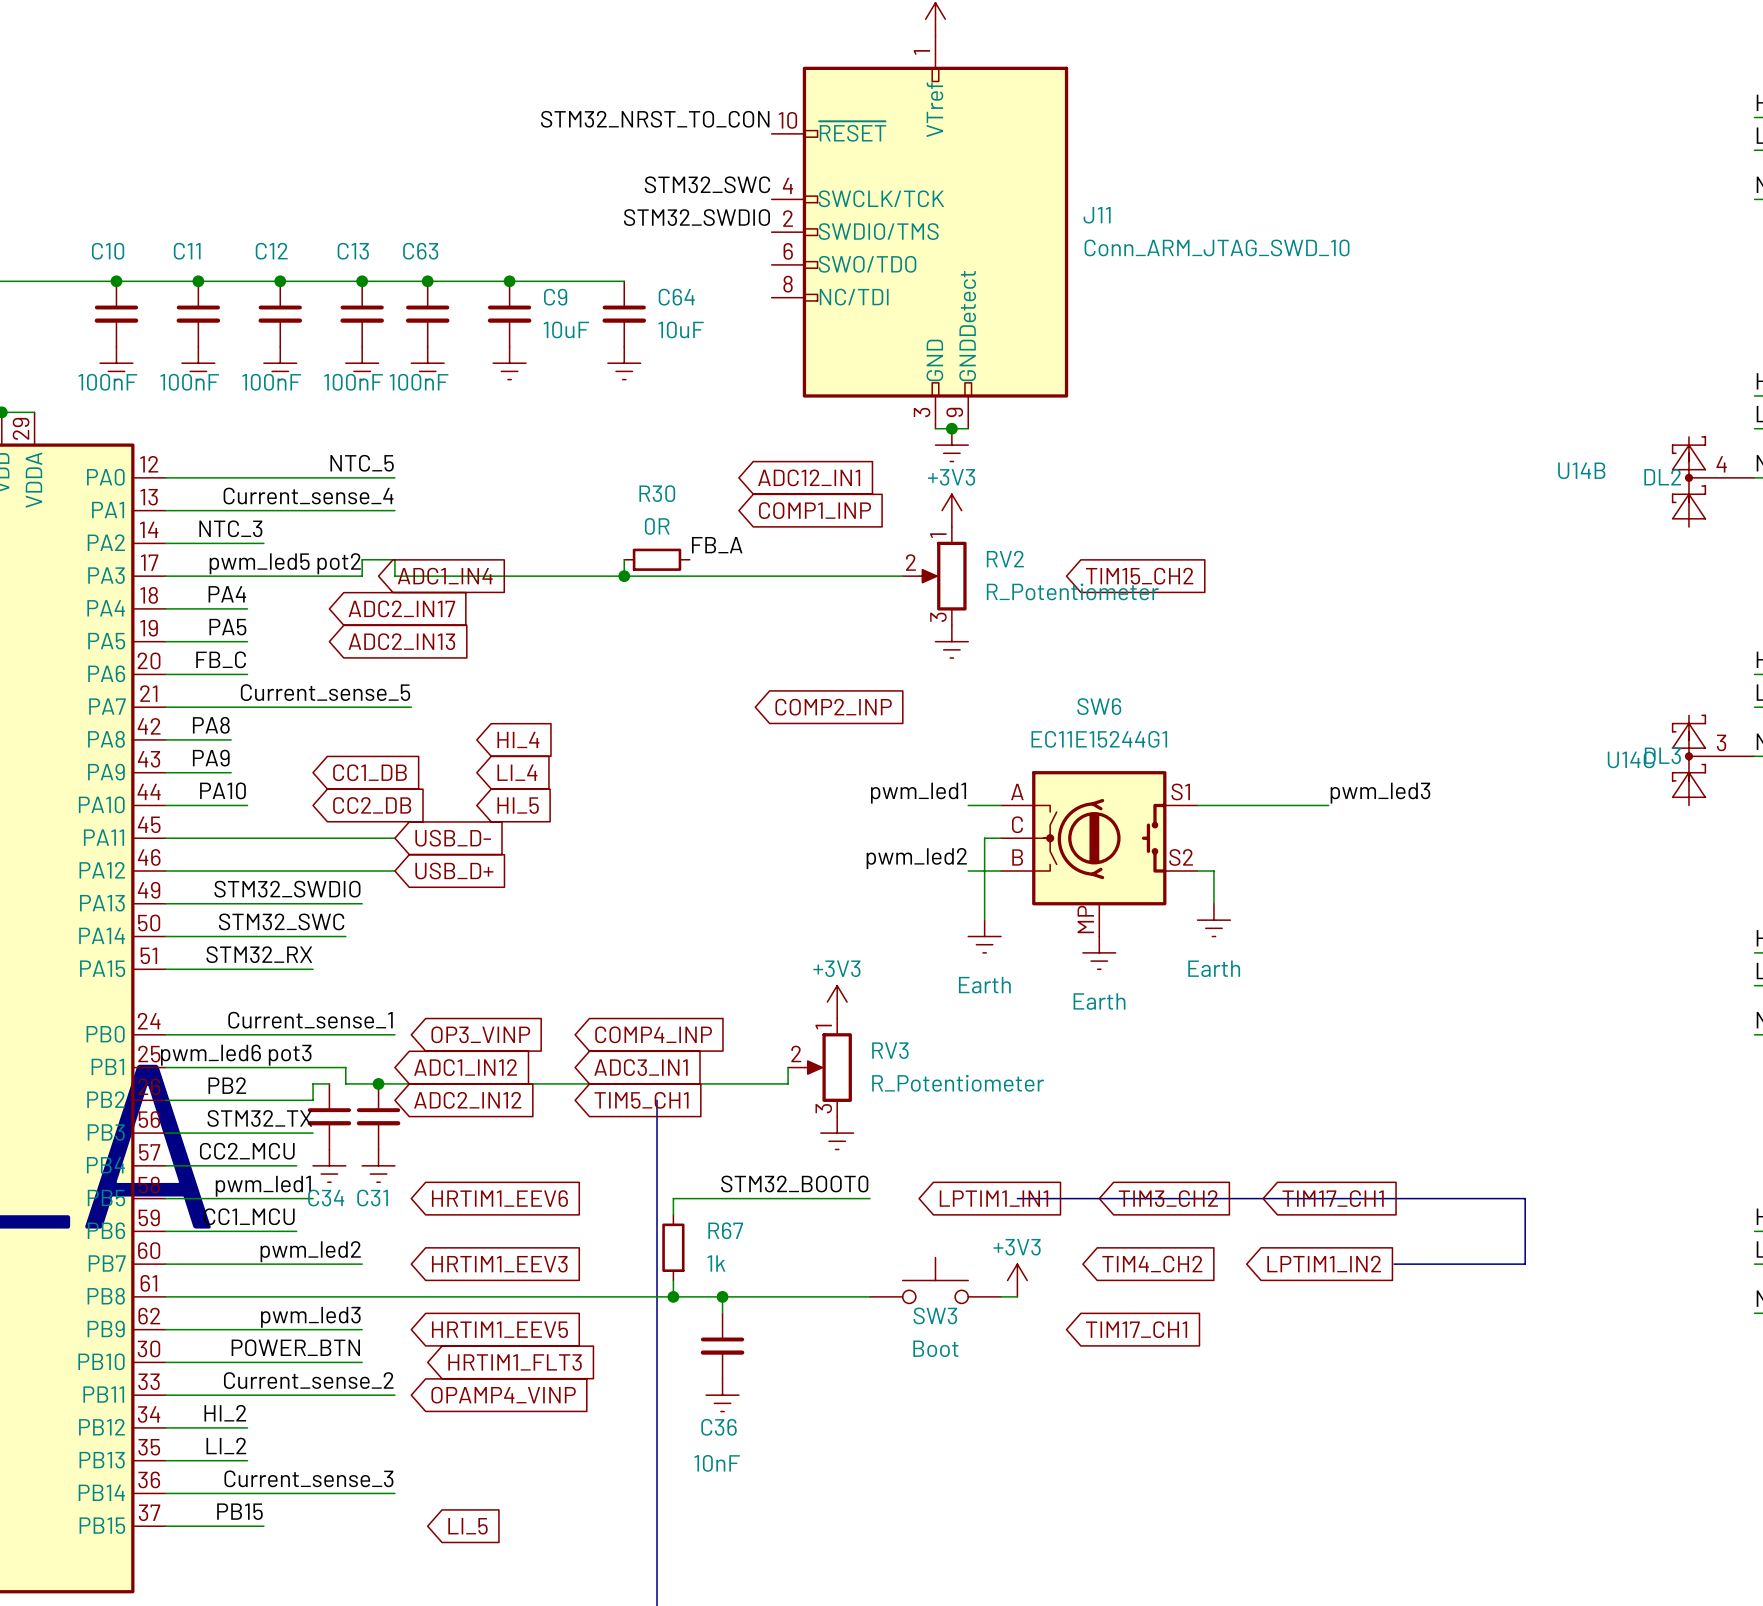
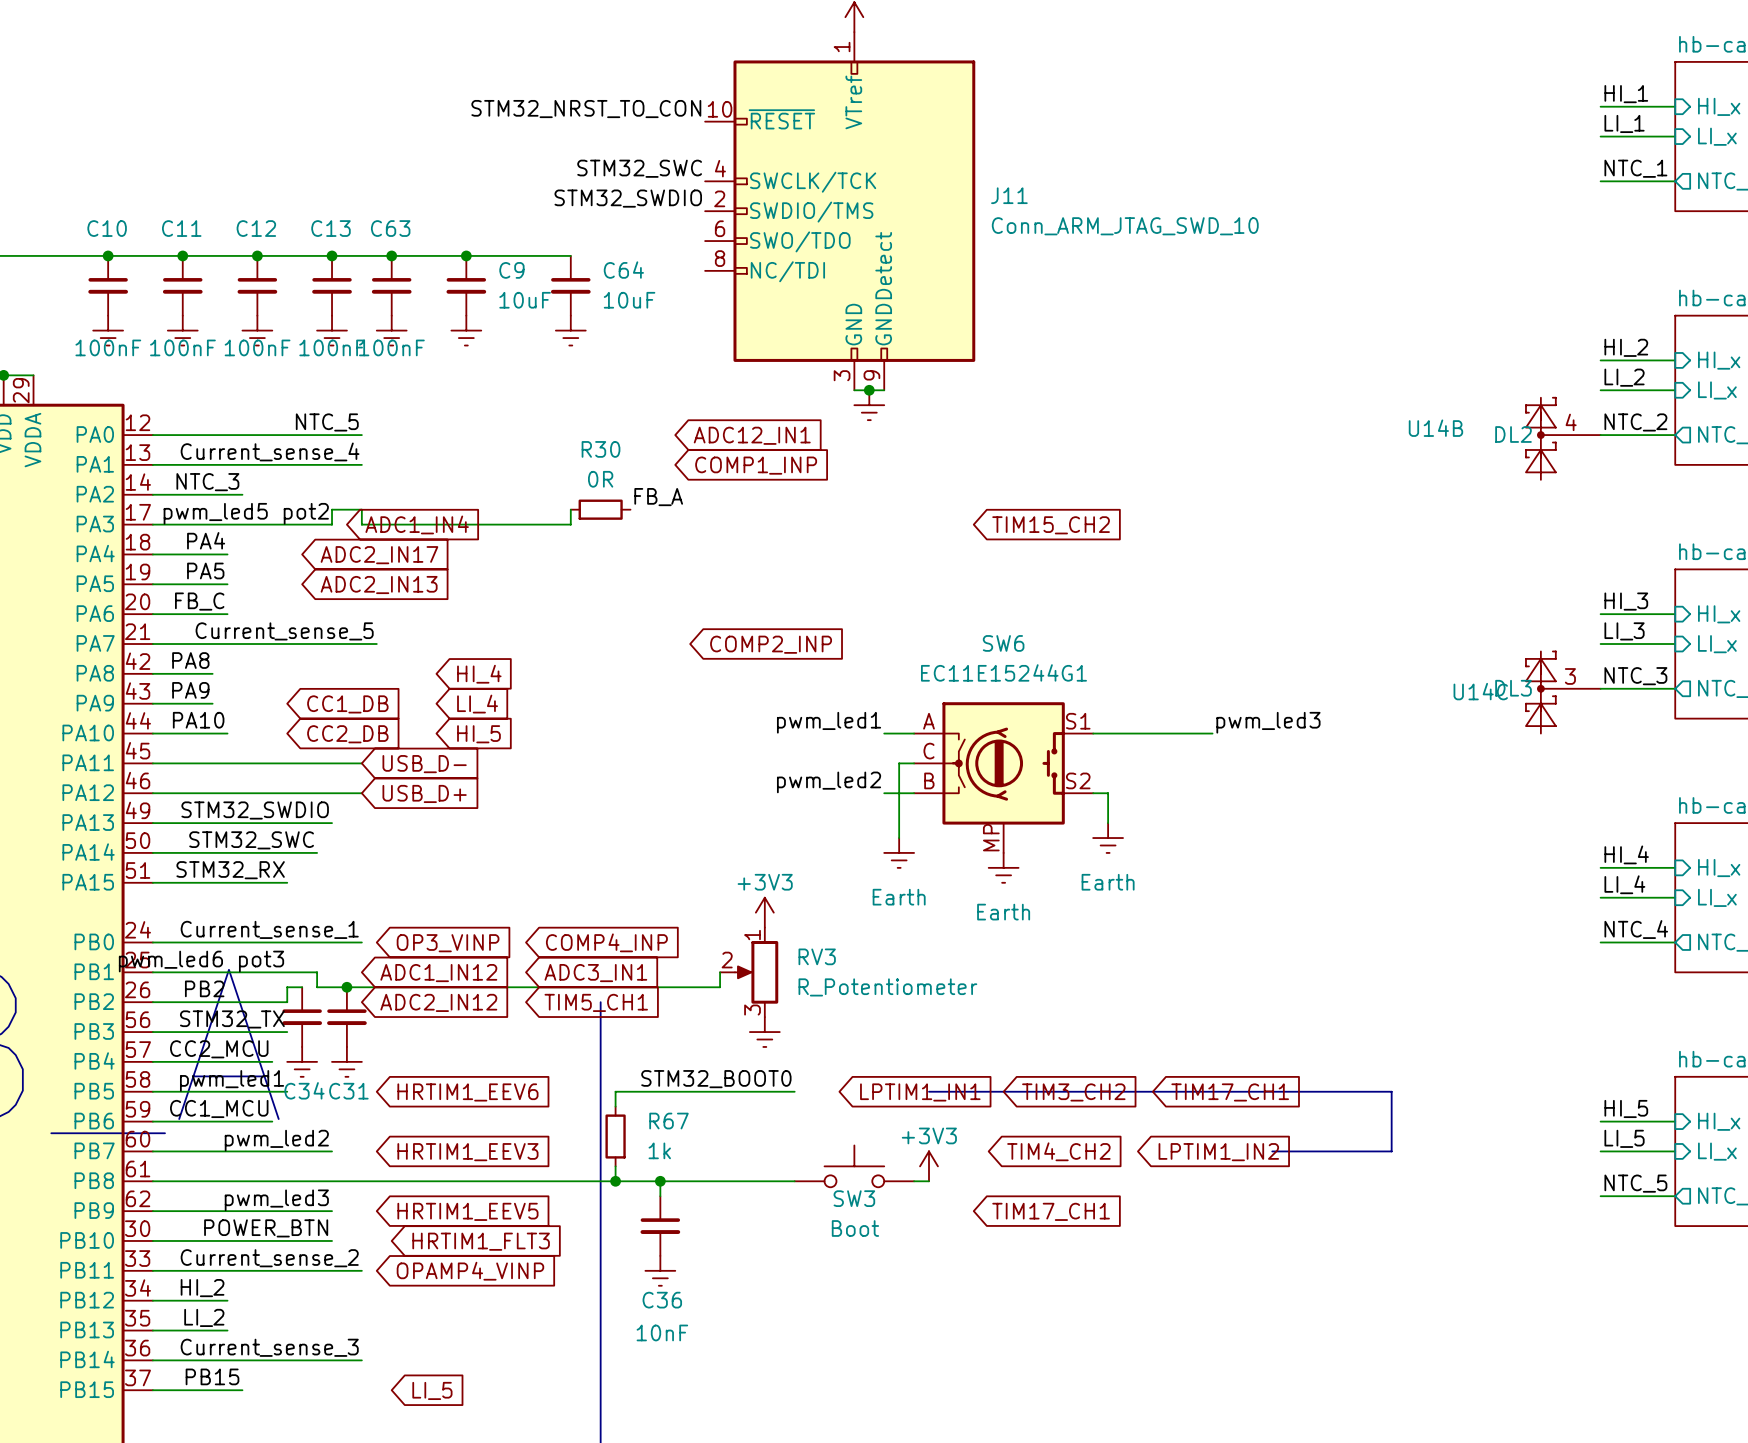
power symbol: +3V3 (951, 510) -> none
wire: (624, 576) (902, 576) -> none
junction: (624, 576) -> none
RV2: R_Potentiometer (934, 576) -> none
power symbol: (951, 641) -> none

